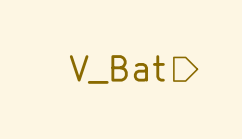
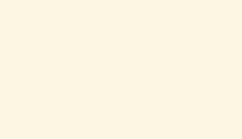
hierarchical label: V_Bat (117, 69) -> none

